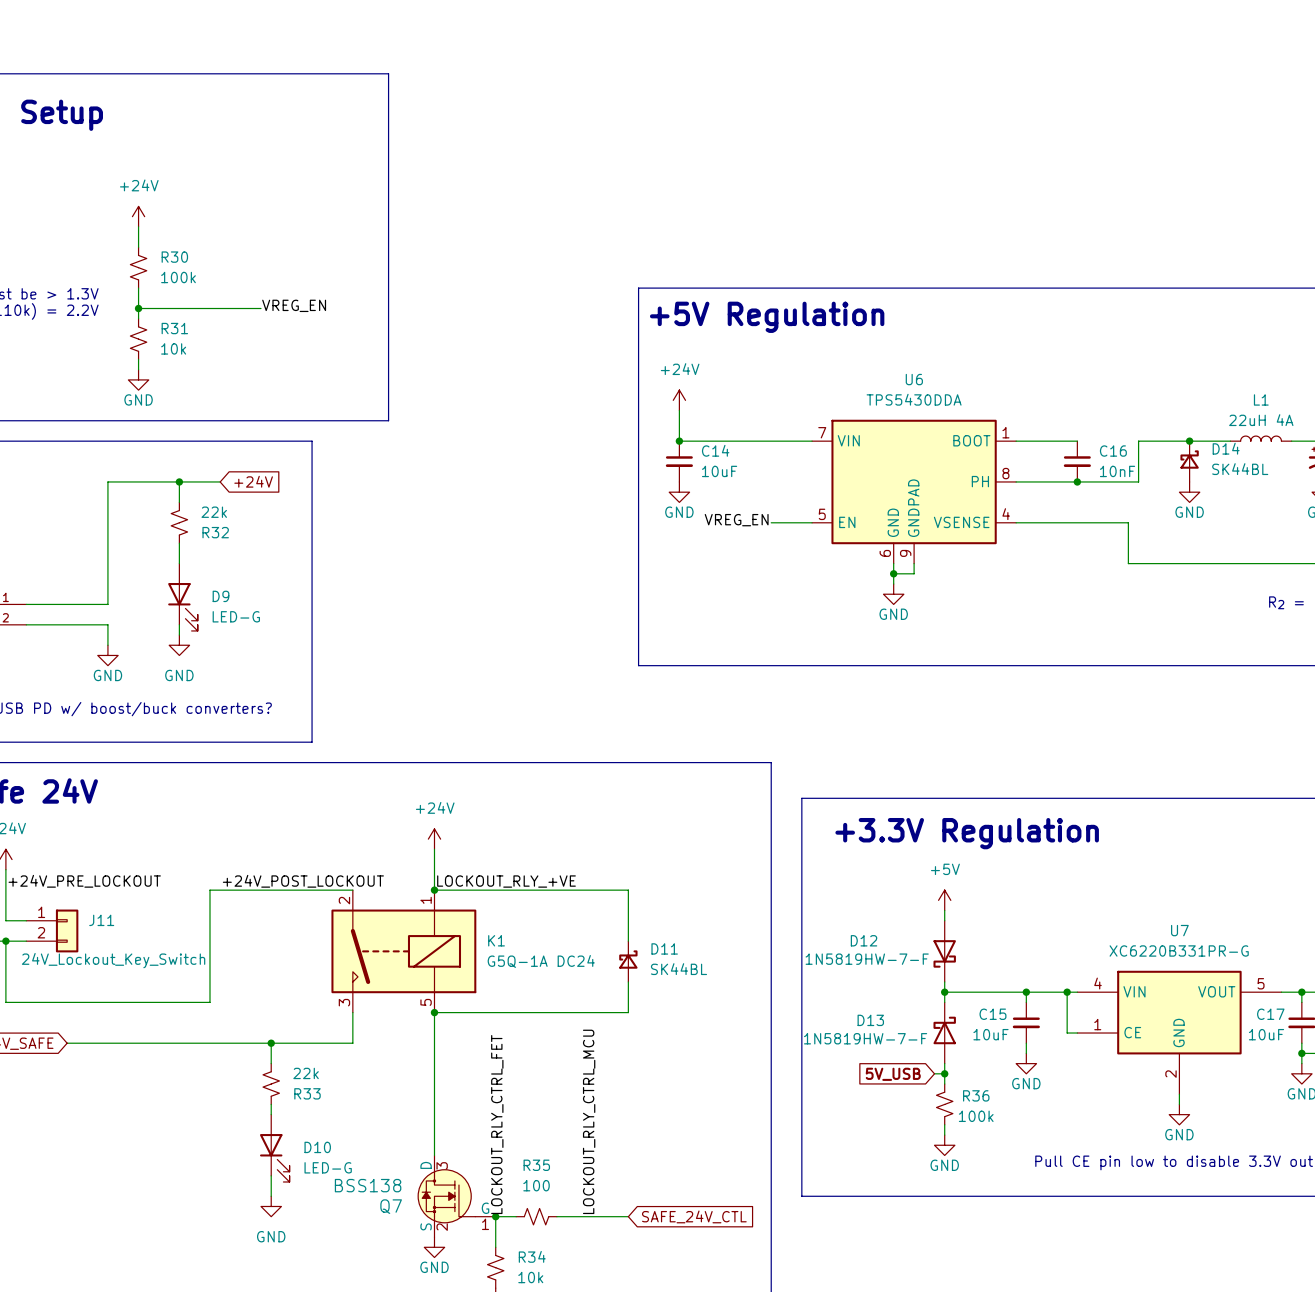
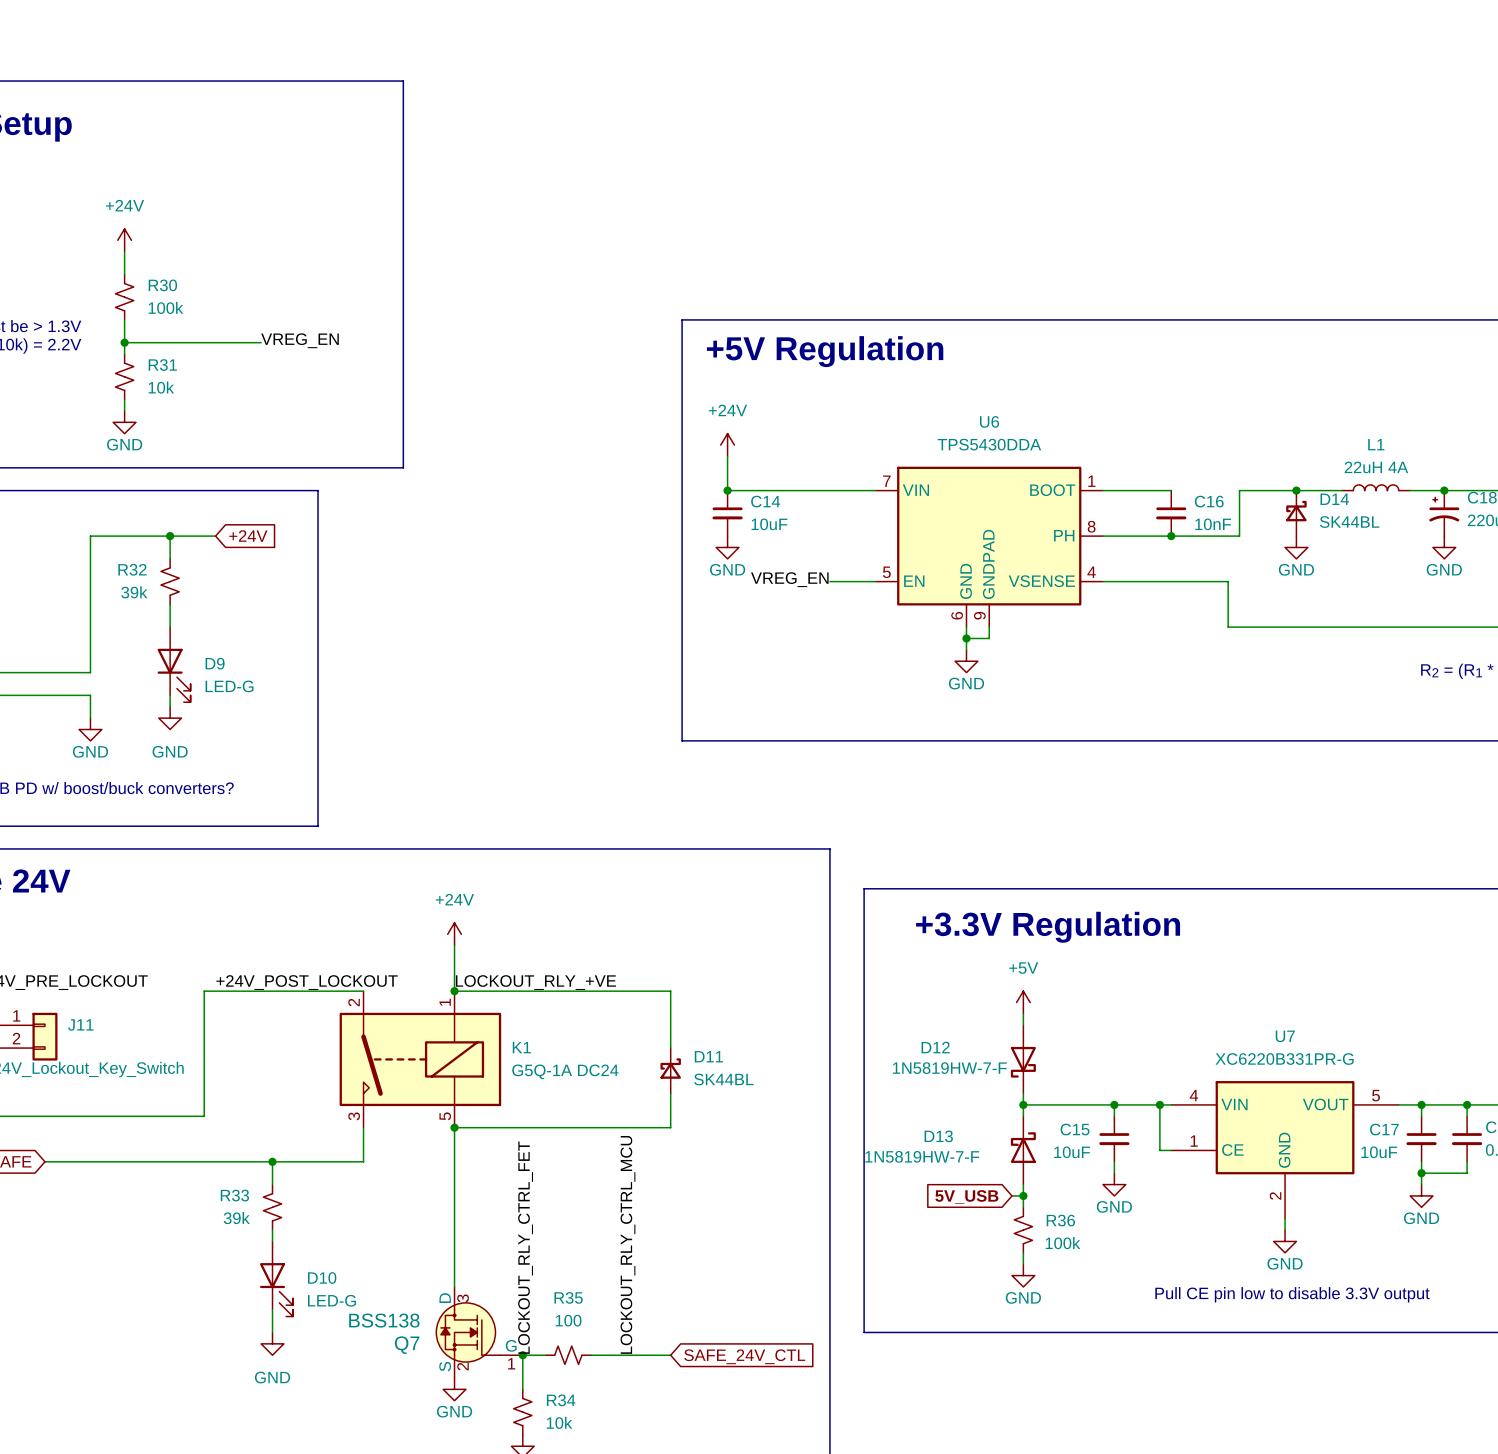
R32 value: 22k (214, 512) -> 39k (134, 592)
R32 name position: R32 (215, 532) -> R32 (132, 569)
R33 value: 22k (306, 1073) -> 39k (236, 1218)
R33 name position: R33 (307, 1093) -> R33 (234, 1195)

